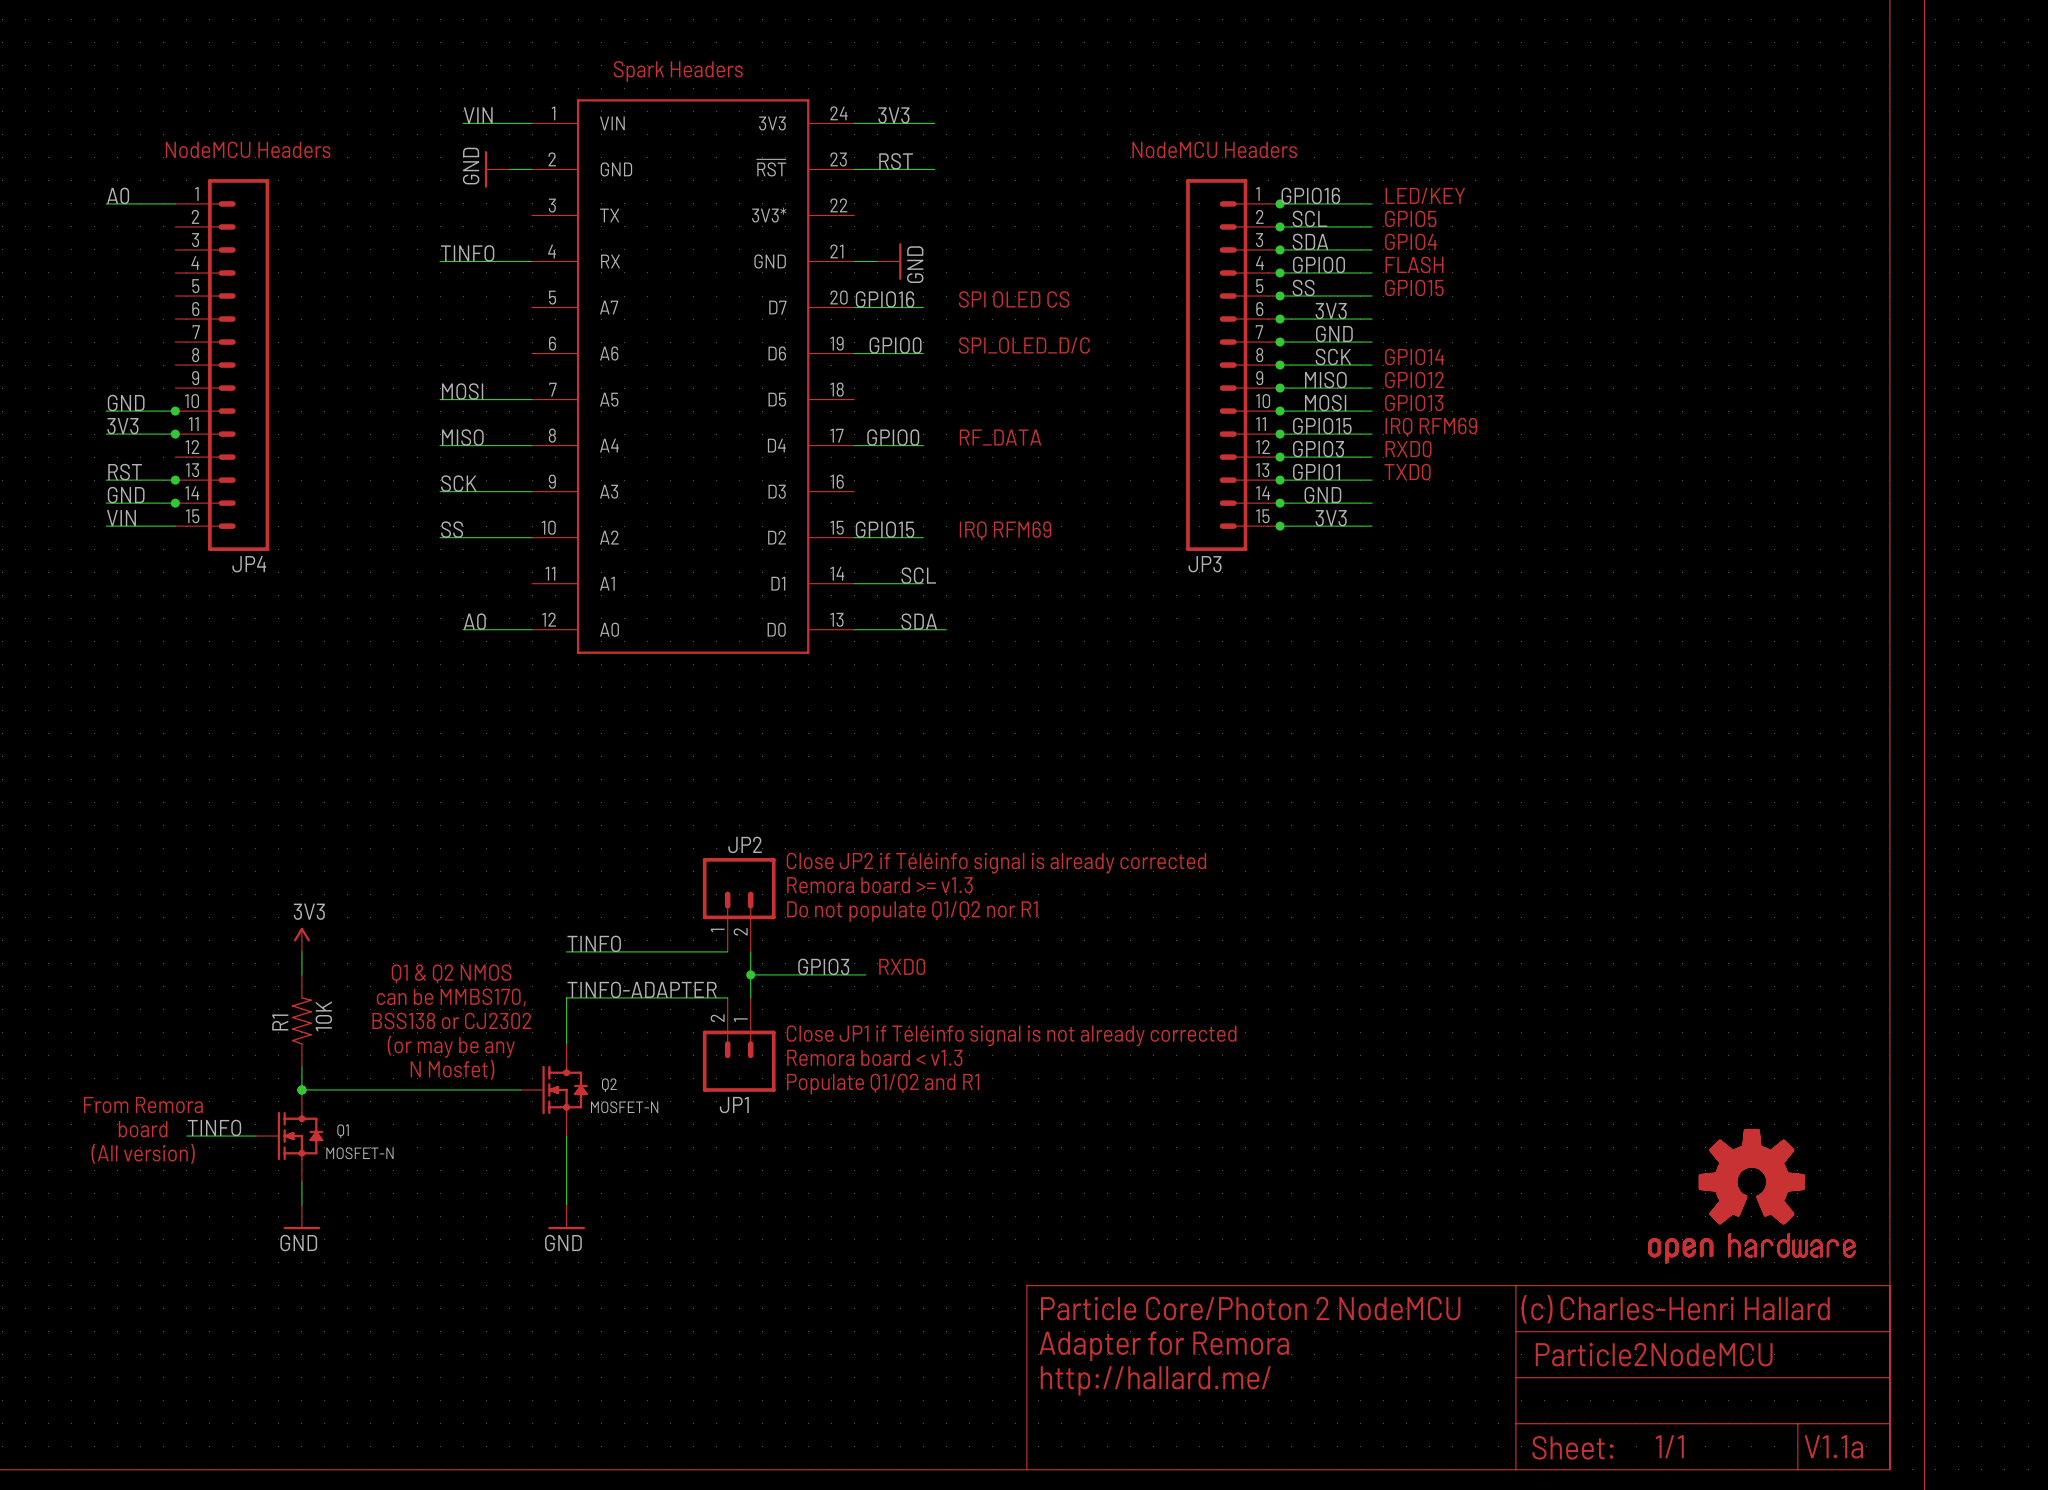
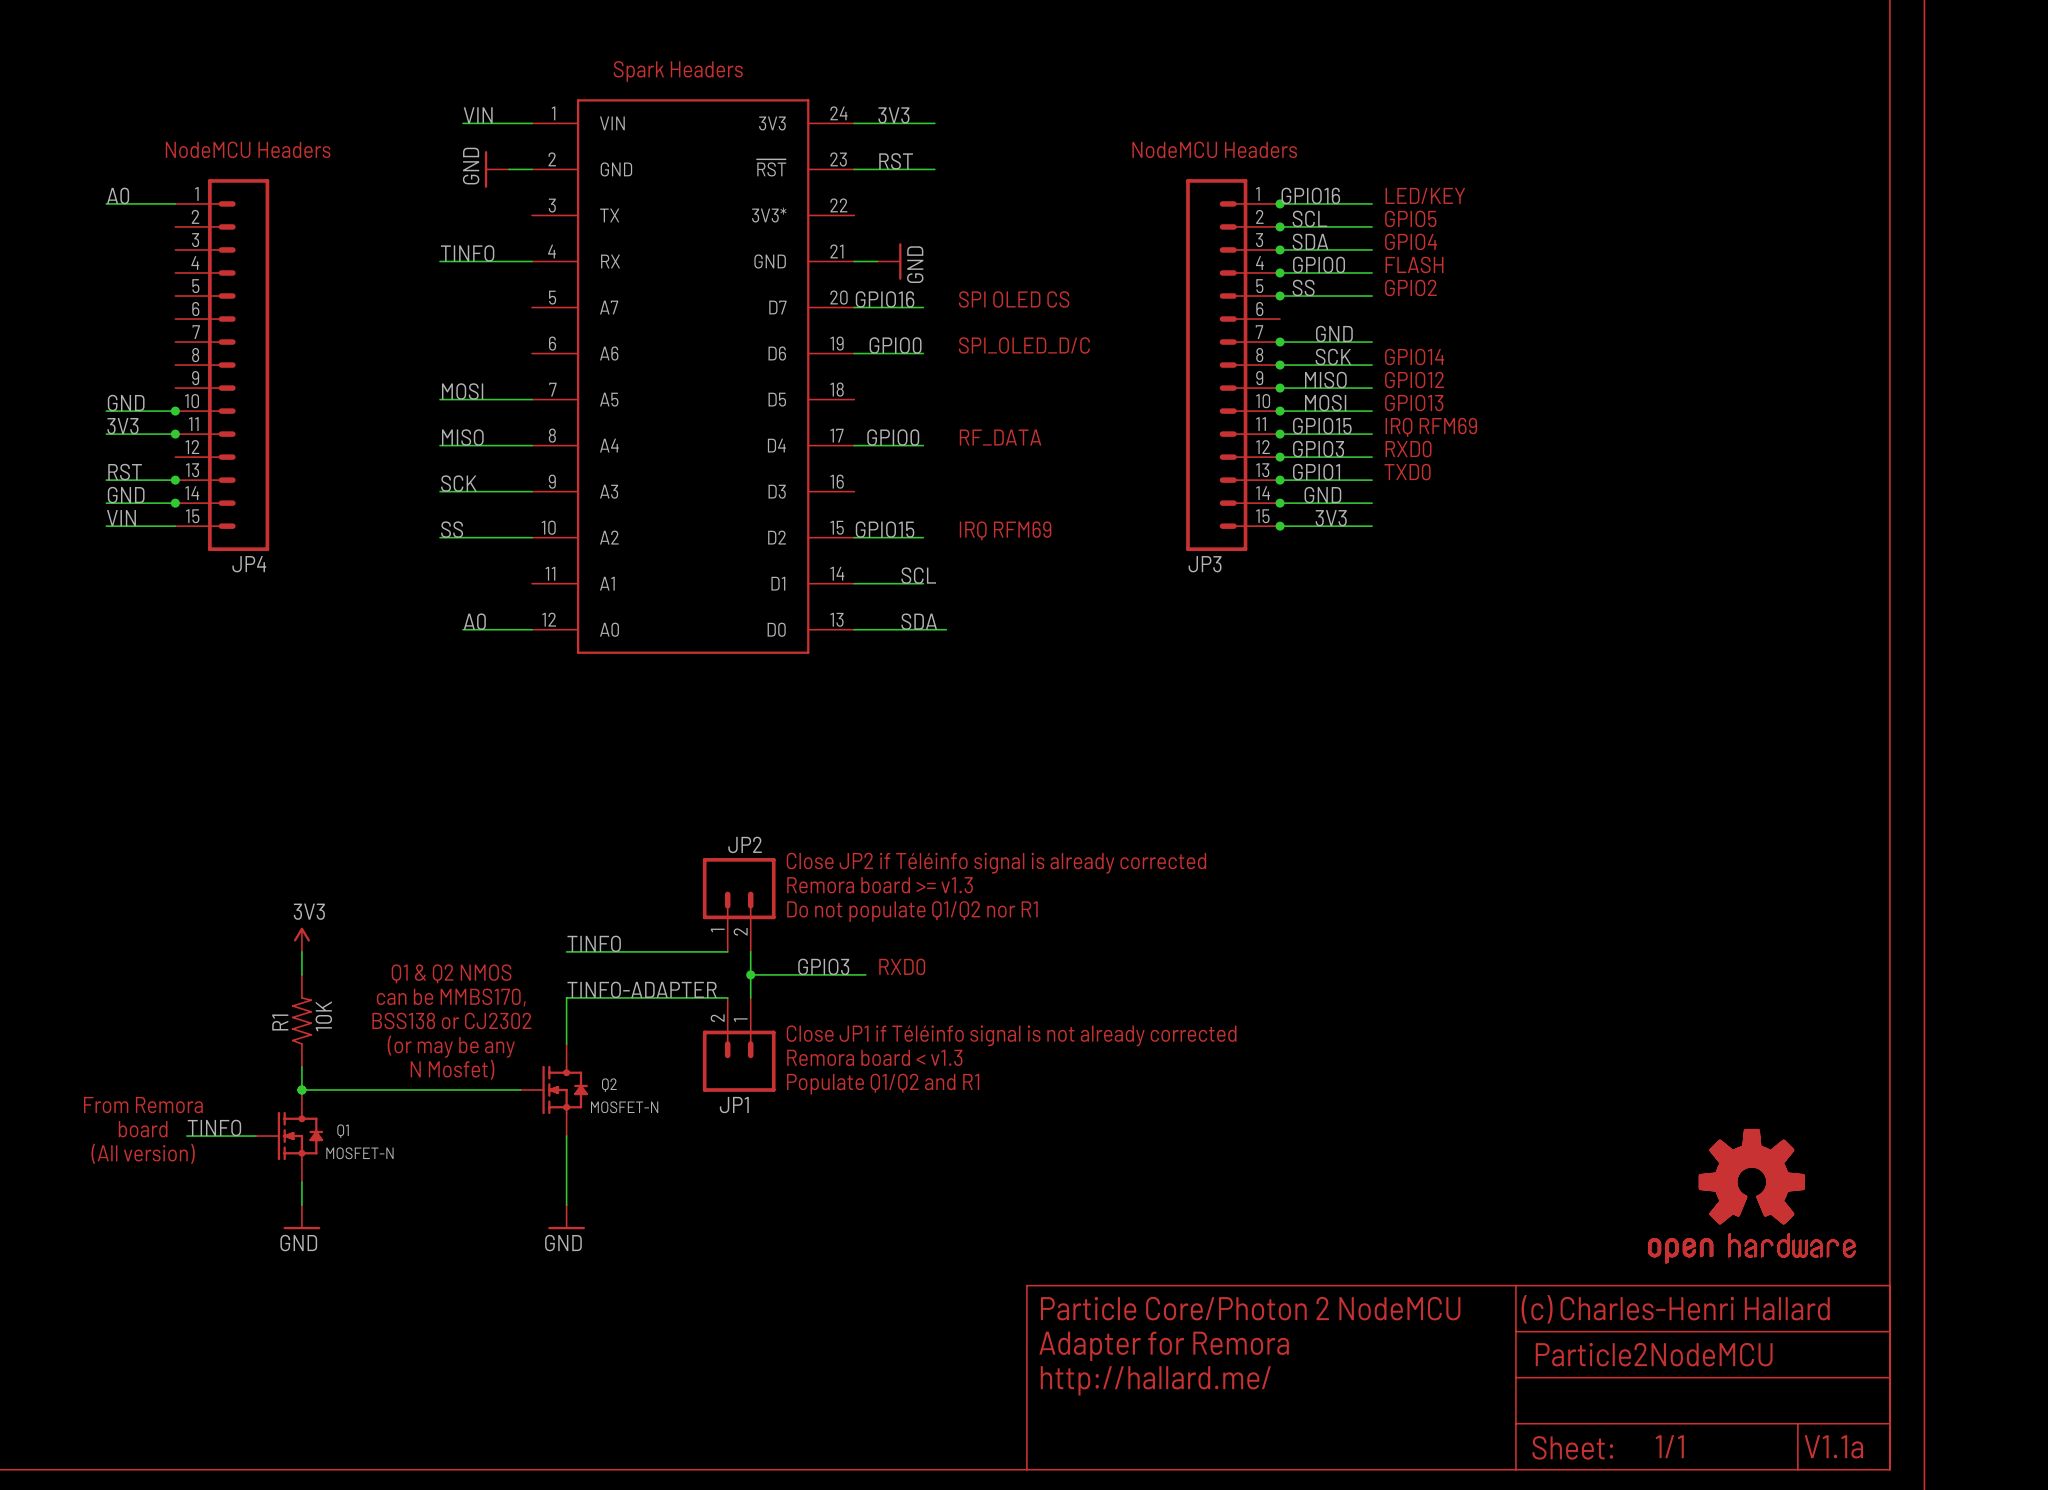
text: GPIO15 (1414, 287) -> GPIO2 (1410, 287)
label: 3V3 (1331, 311) -> none
wire: (1280, 319) (1372, 319) -> none
junction: (1280, 319) -> none

